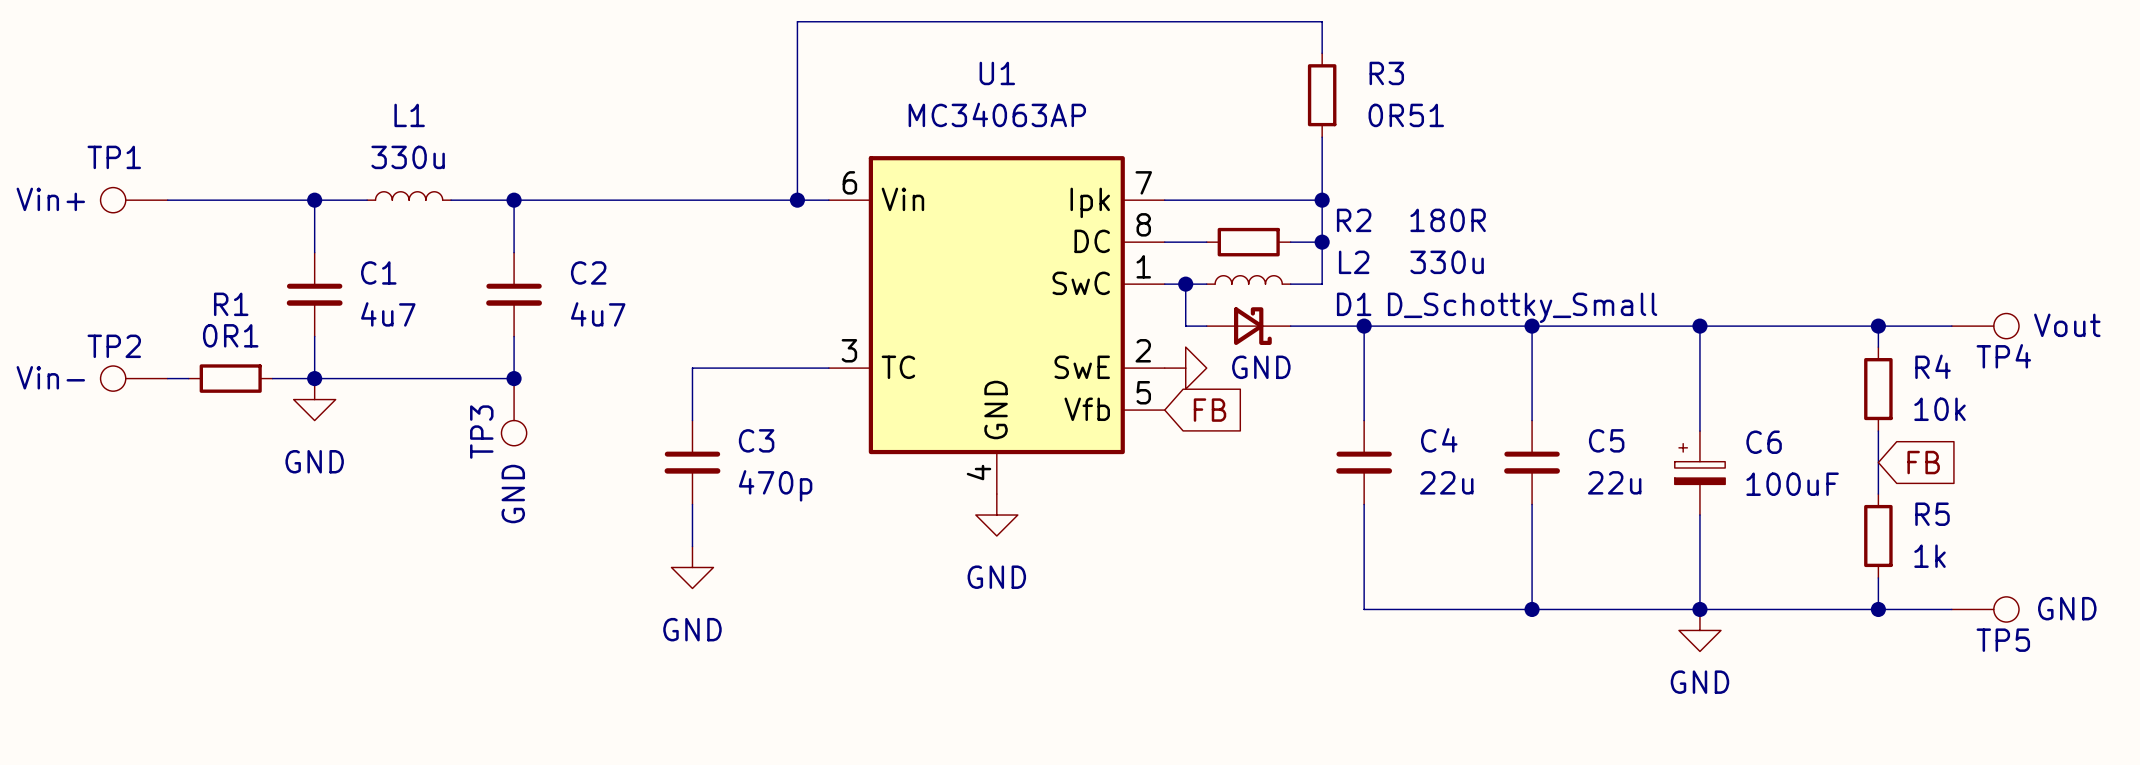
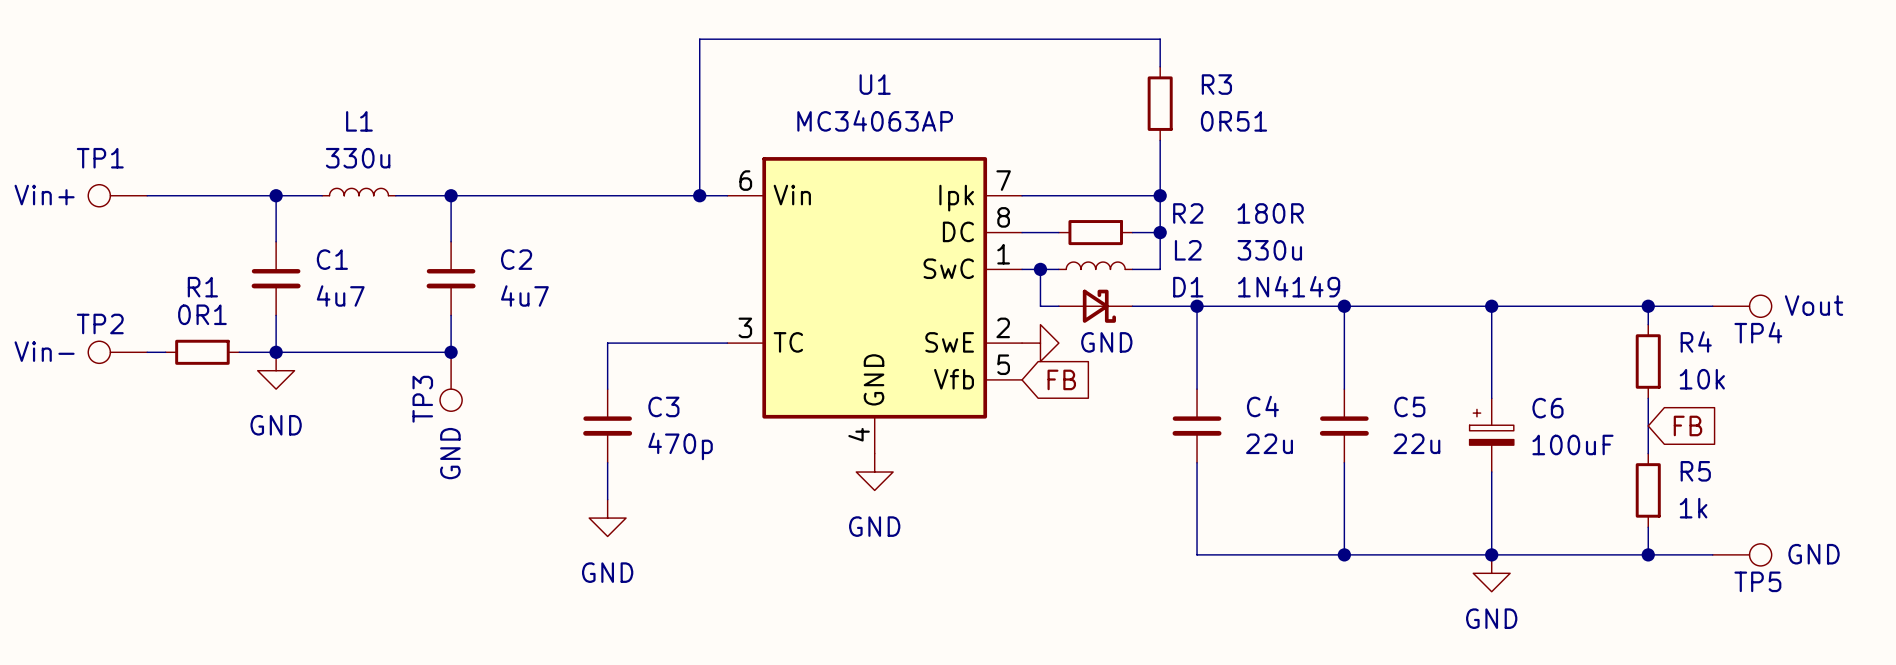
D1 value: D_Schottky_Small (1522, 307) -> 1N4149 (1289, 286)

